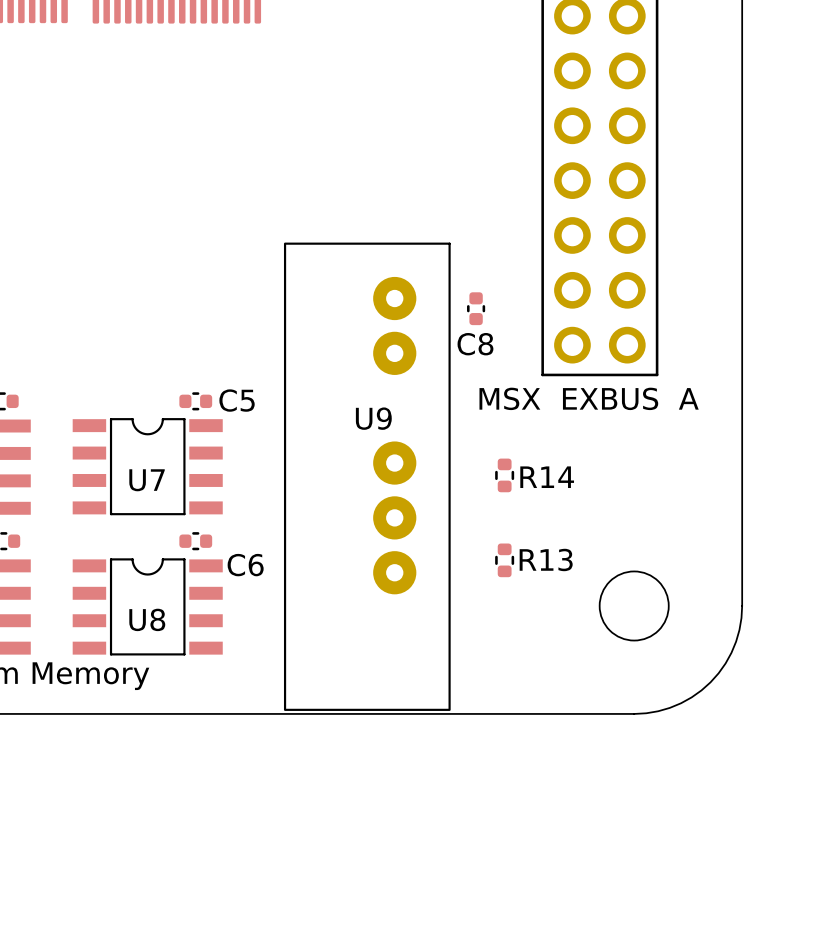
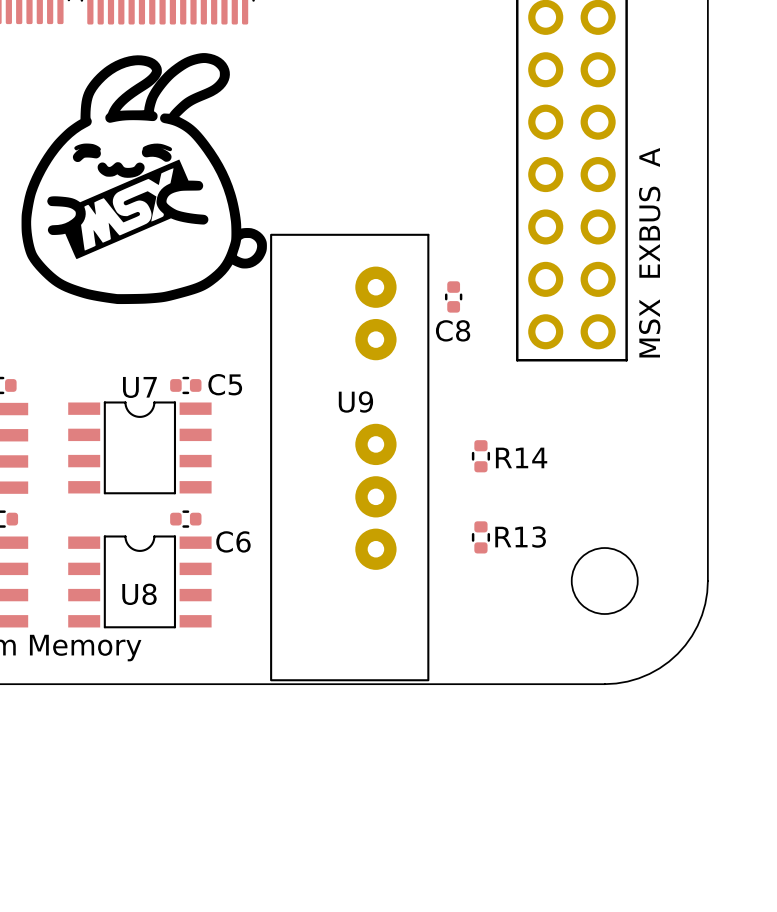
drawing: none -> [21, 53, 267, 305]
part text rotation: 0° (589, 398) -> 90° counterclockwise (649, 252)
U7 name position: U7 (147, 480) -> U7 (139, 387)

